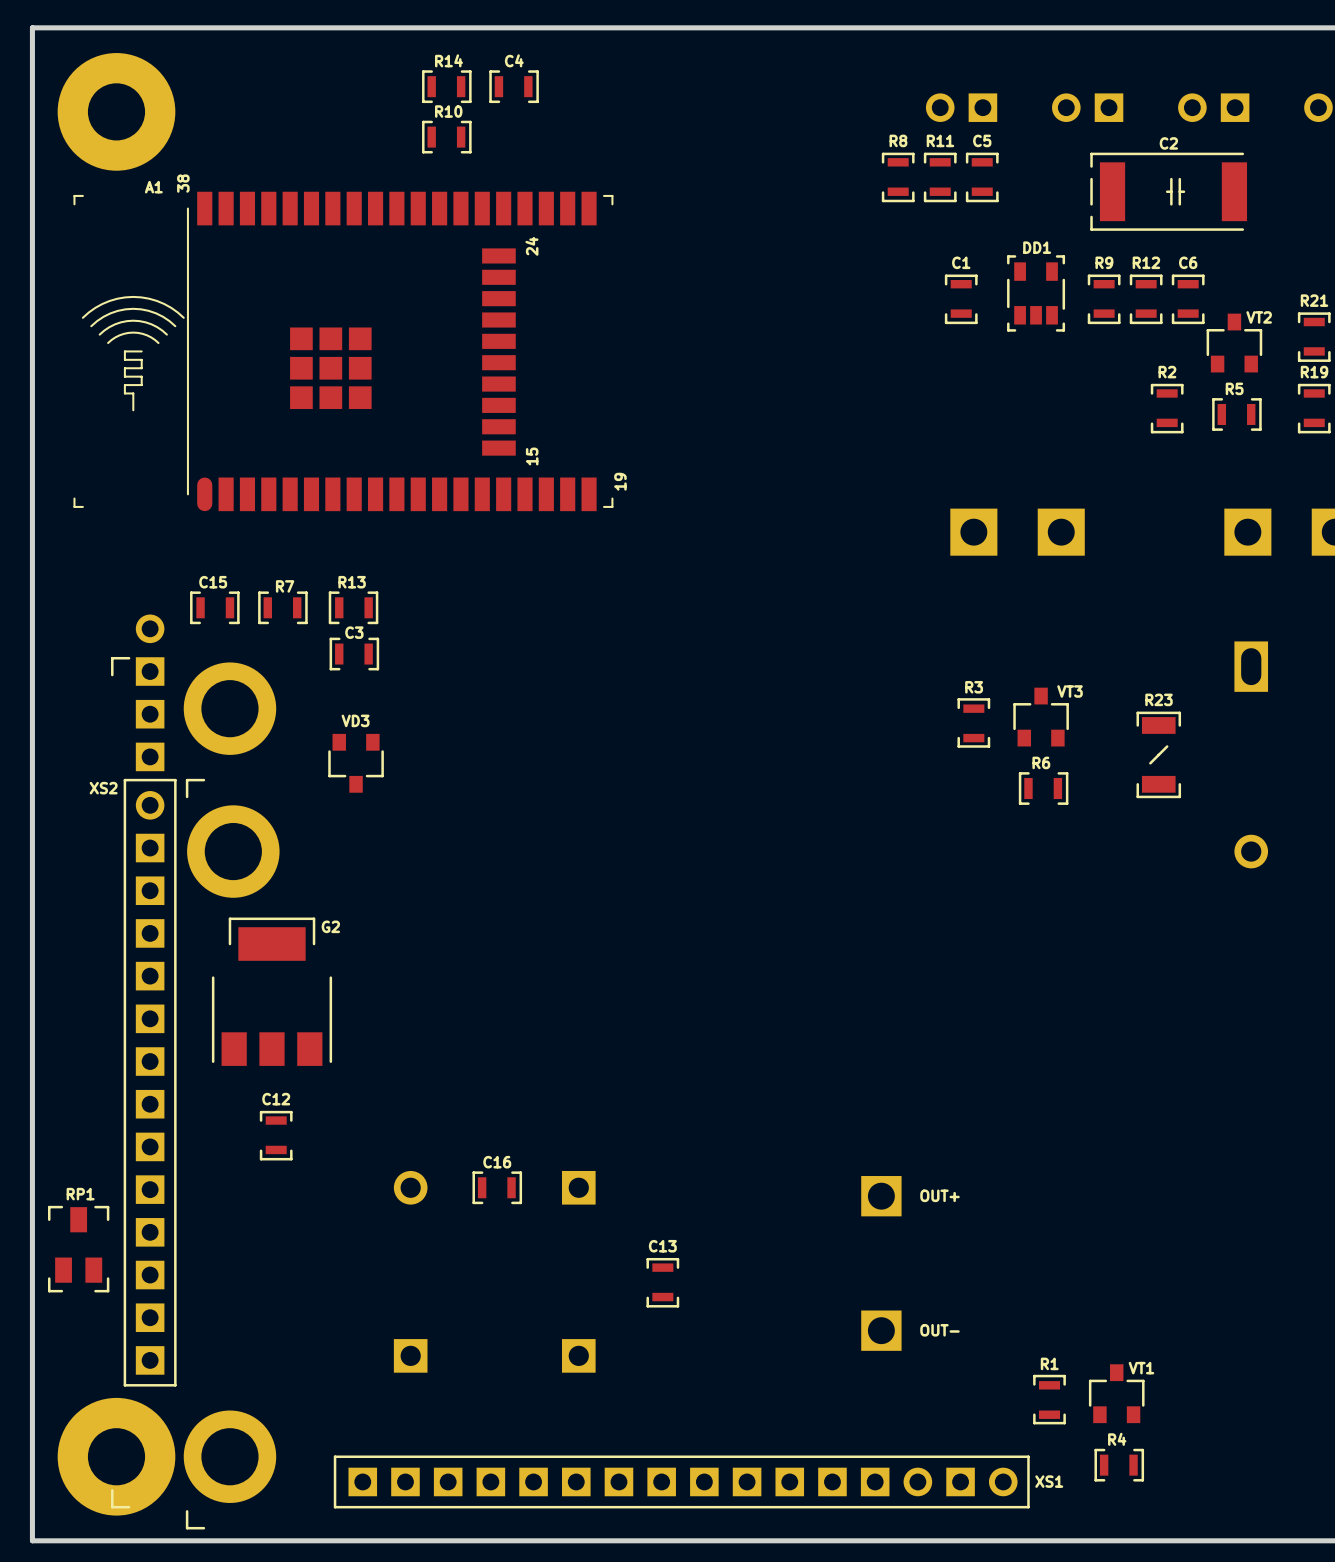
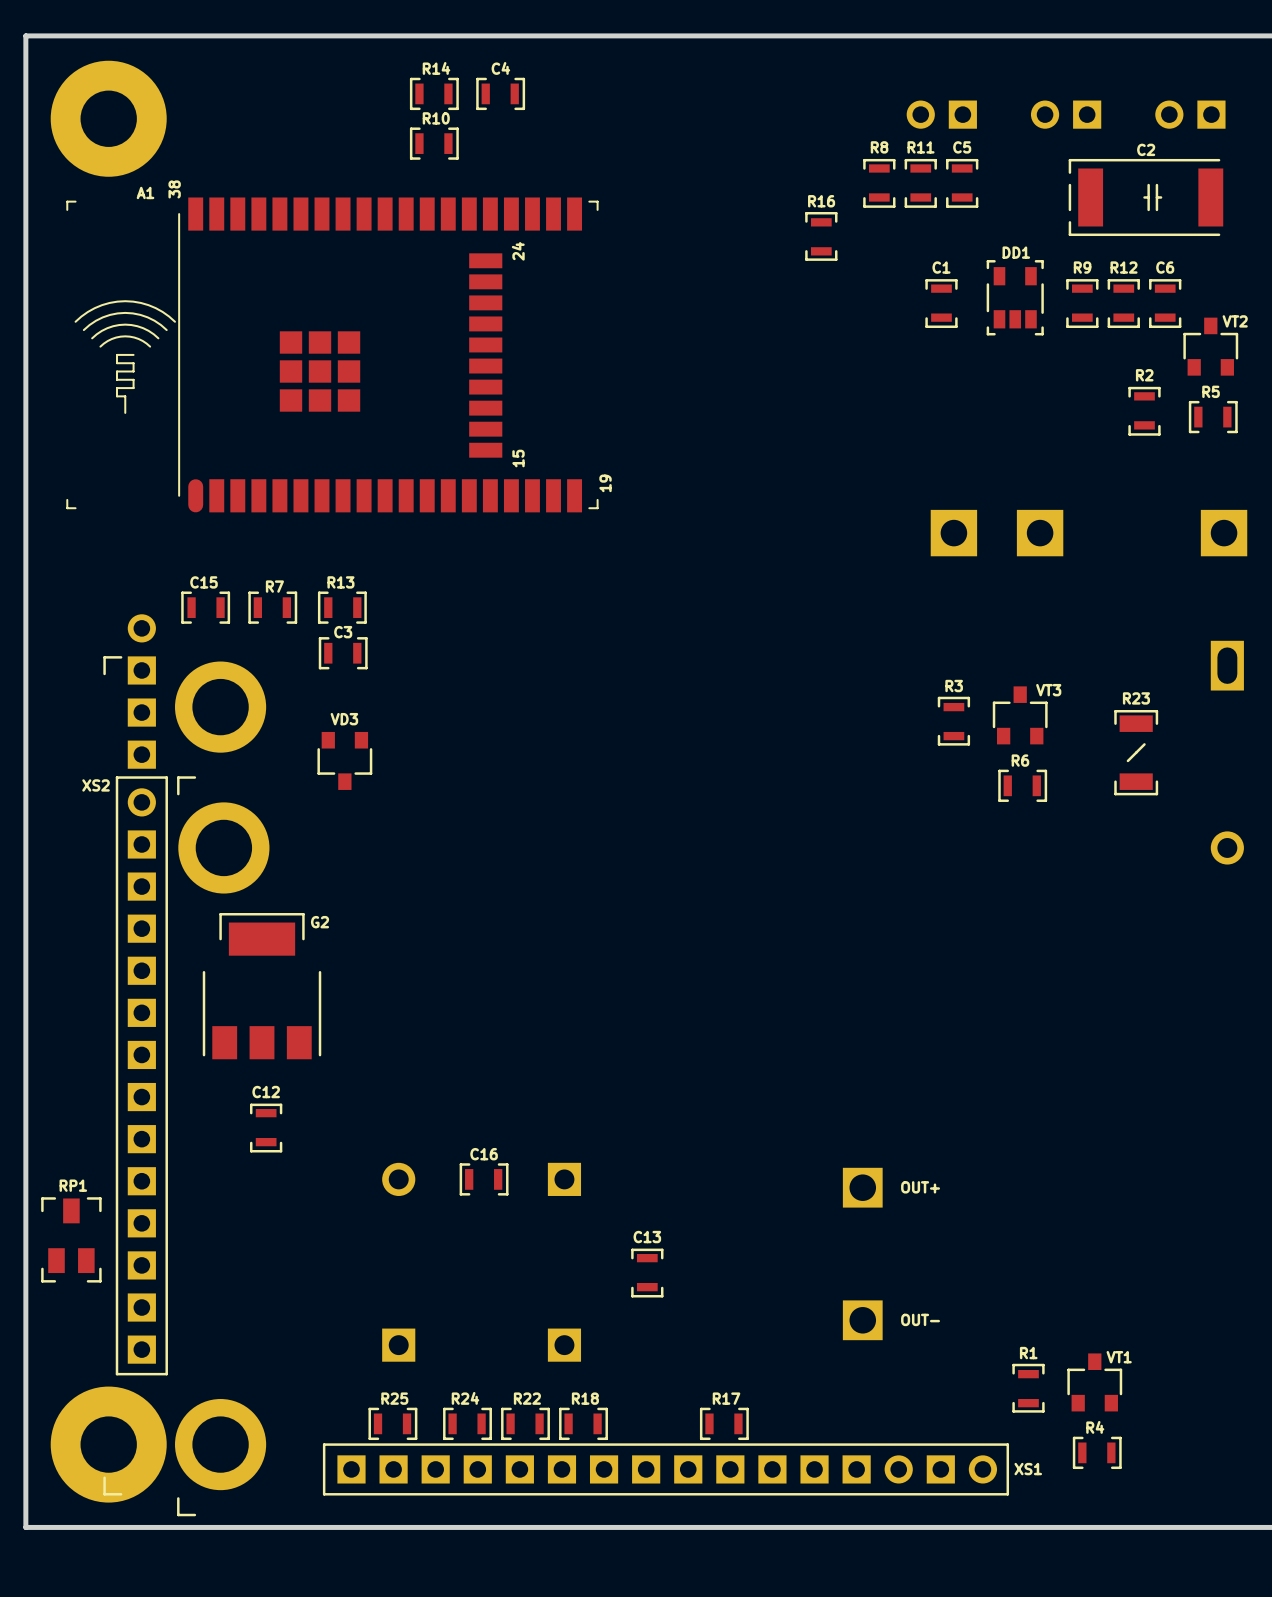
R16: none -> (821, 236)
R25: none -> (392, 1423)
R24: none -> (467, 1423)
R22: none -> (525, 1423)
R18: none -> (583, 1423)
R17: none -> (724, 1423)

